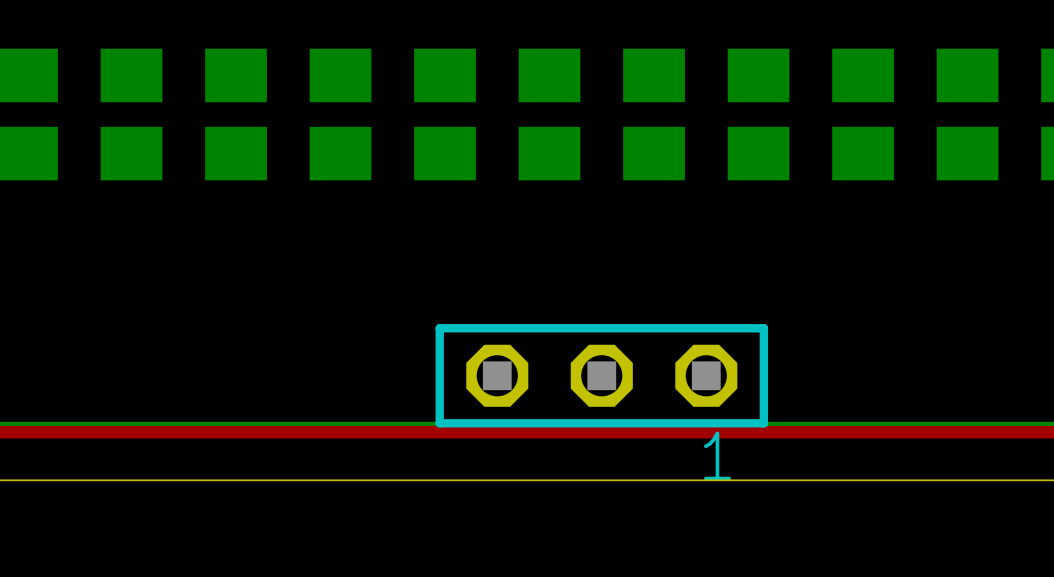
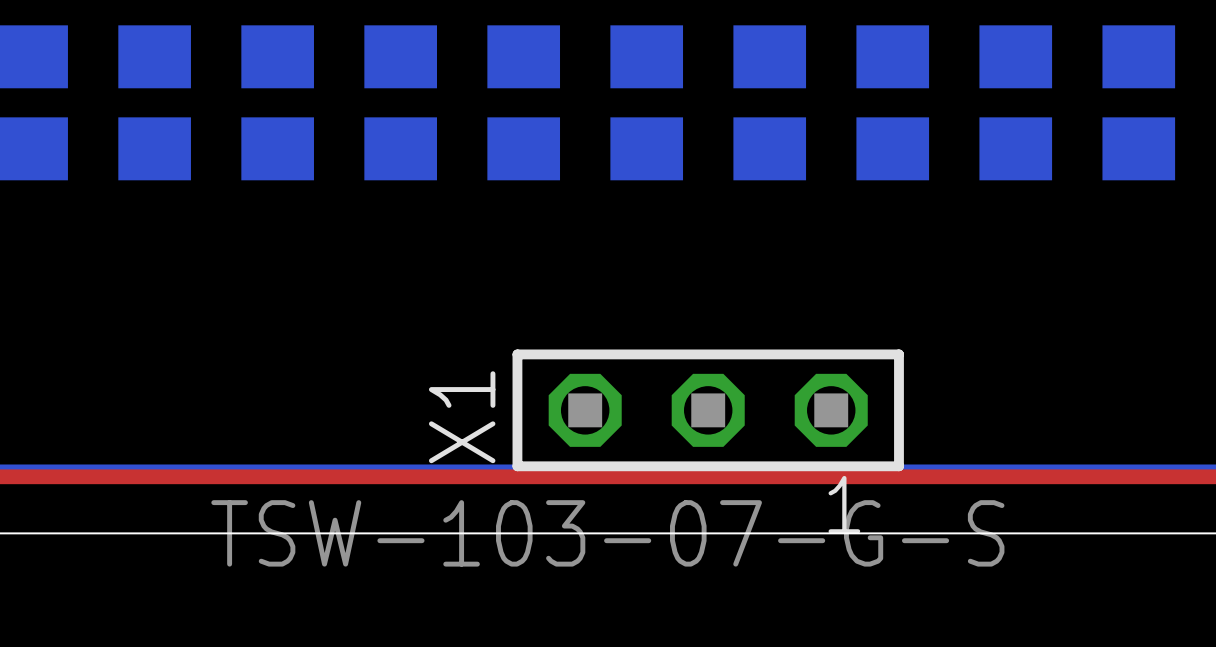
X1 name: none -> X1 (462, 417)
X1 value: none -> TSW-103-07-G-S (607, 533)

